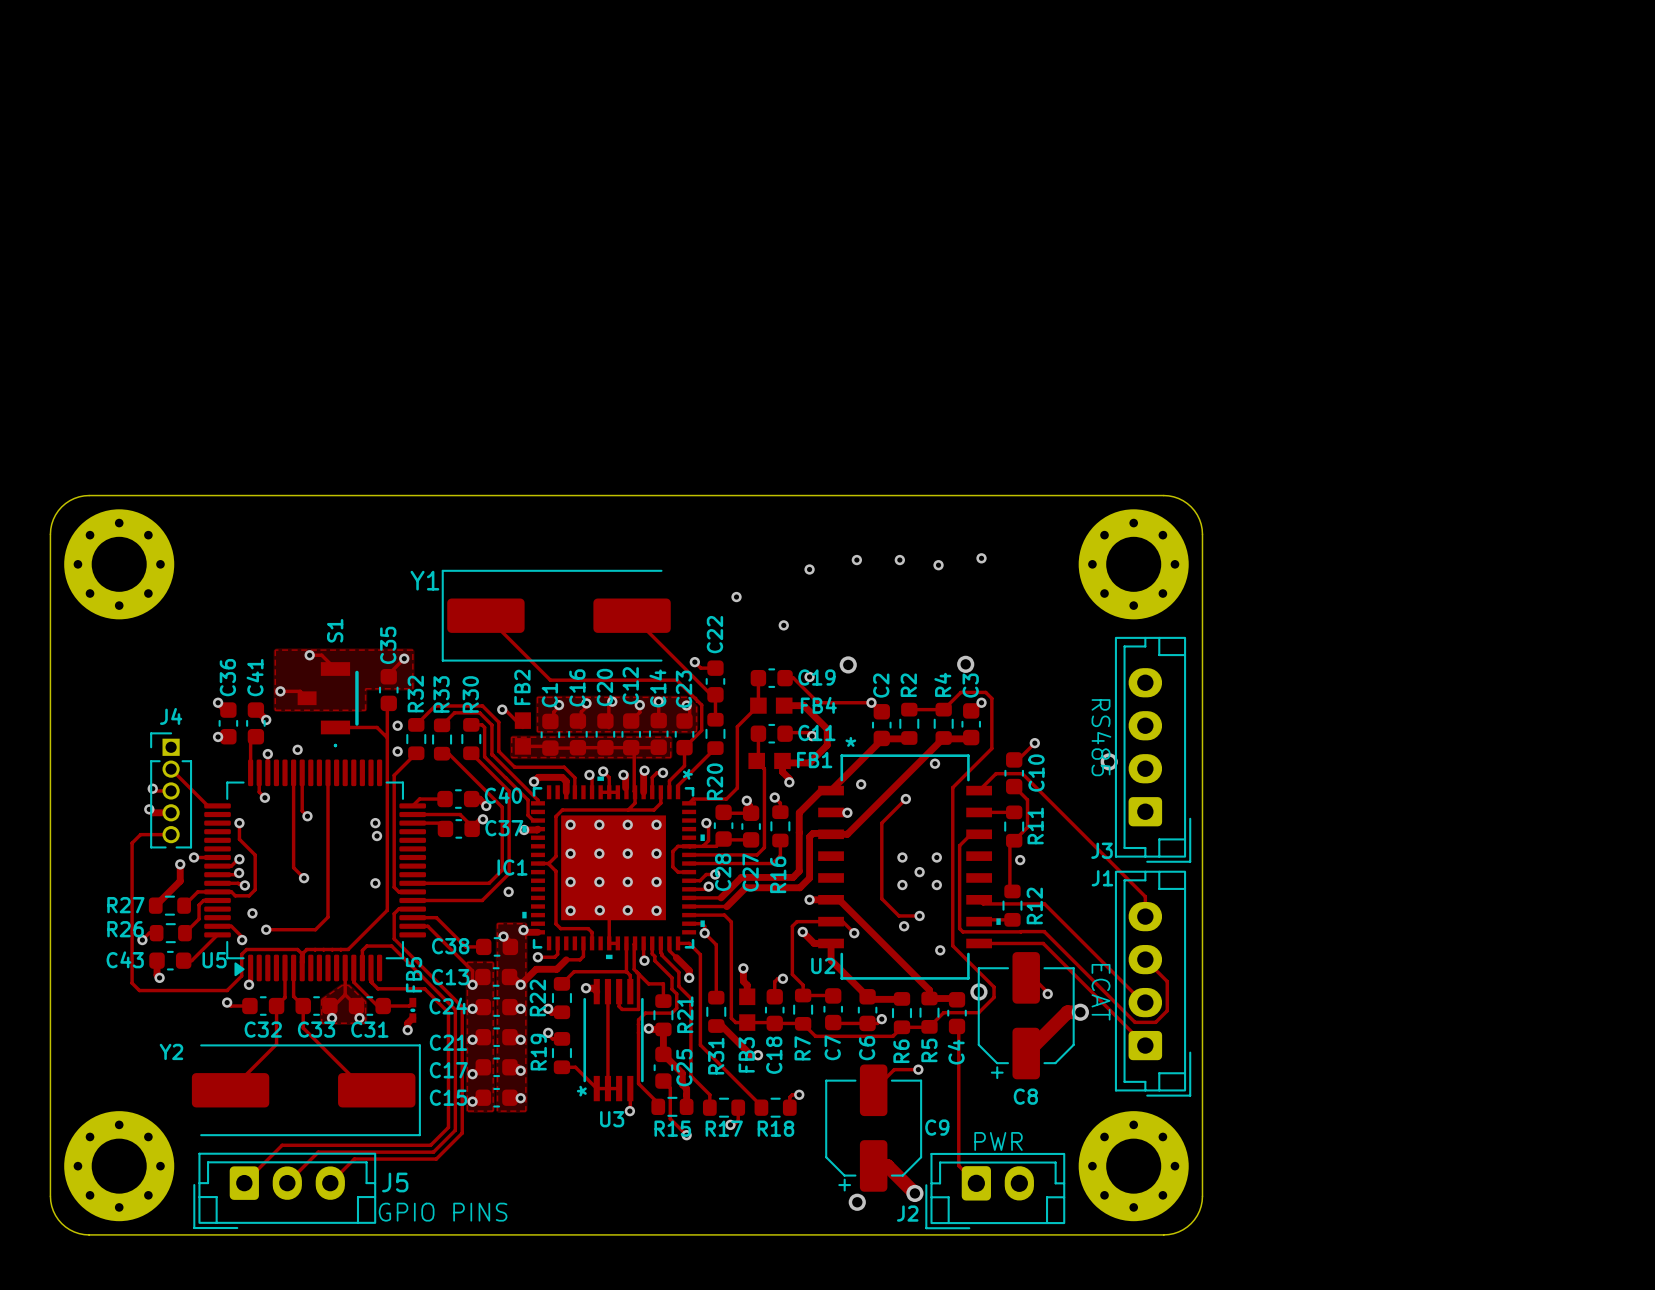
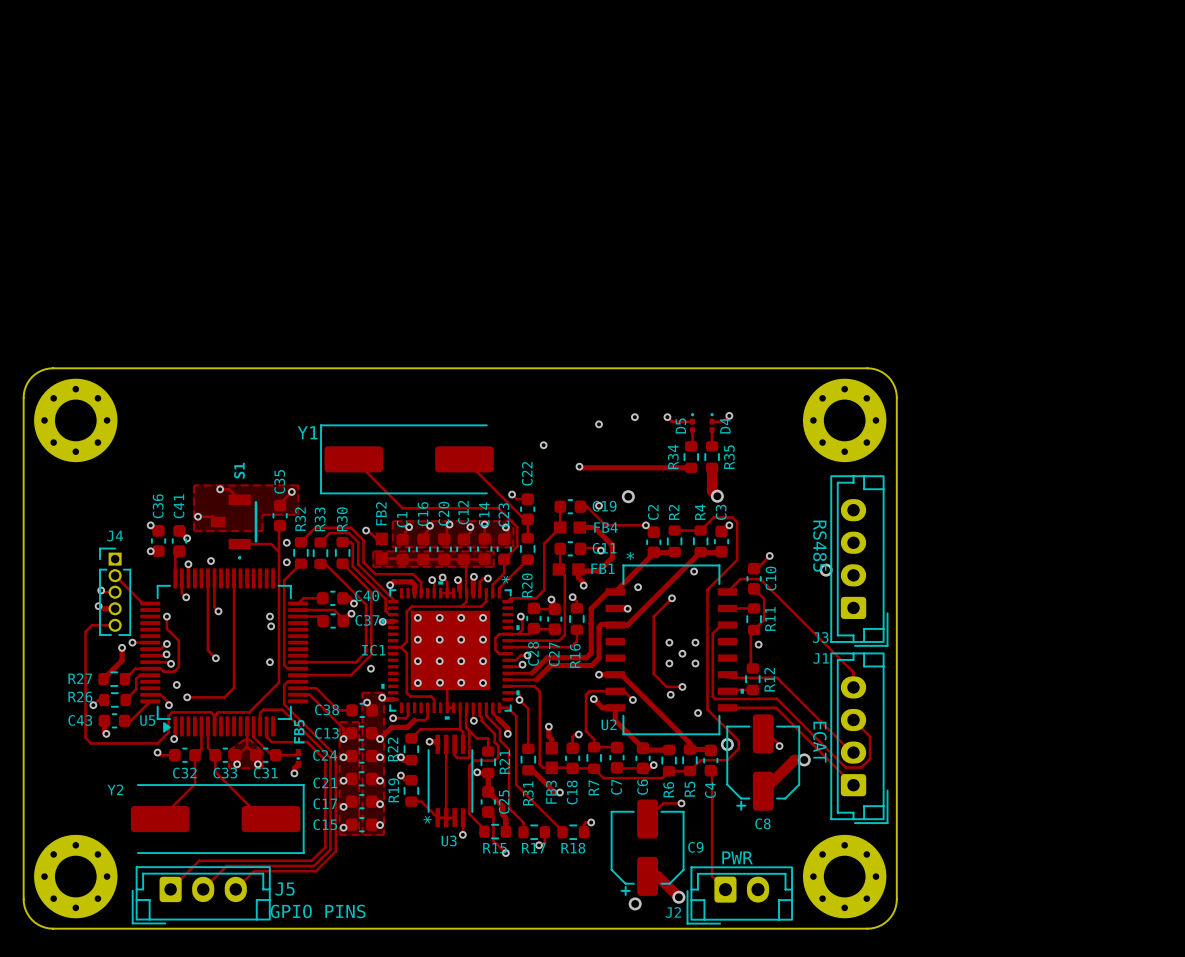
track: none -> (729, 415) (723, 421) (712, 421)
track: none -> (667, 417) (671, 421) (692, 421)
via: (938, 565) -> none
D5: none -> (692, 423)
D4: none -> (712, 423)
track: none -> (692, 430) (692, 446)
track: none -> (712, 430) (712, 446)
R34: none -> (691, 457)
R35: none -> (712, 457)
track: none -> (579, 466) (692, 467)
track: none -> (712, 467) (712, 490) (717, 496)

